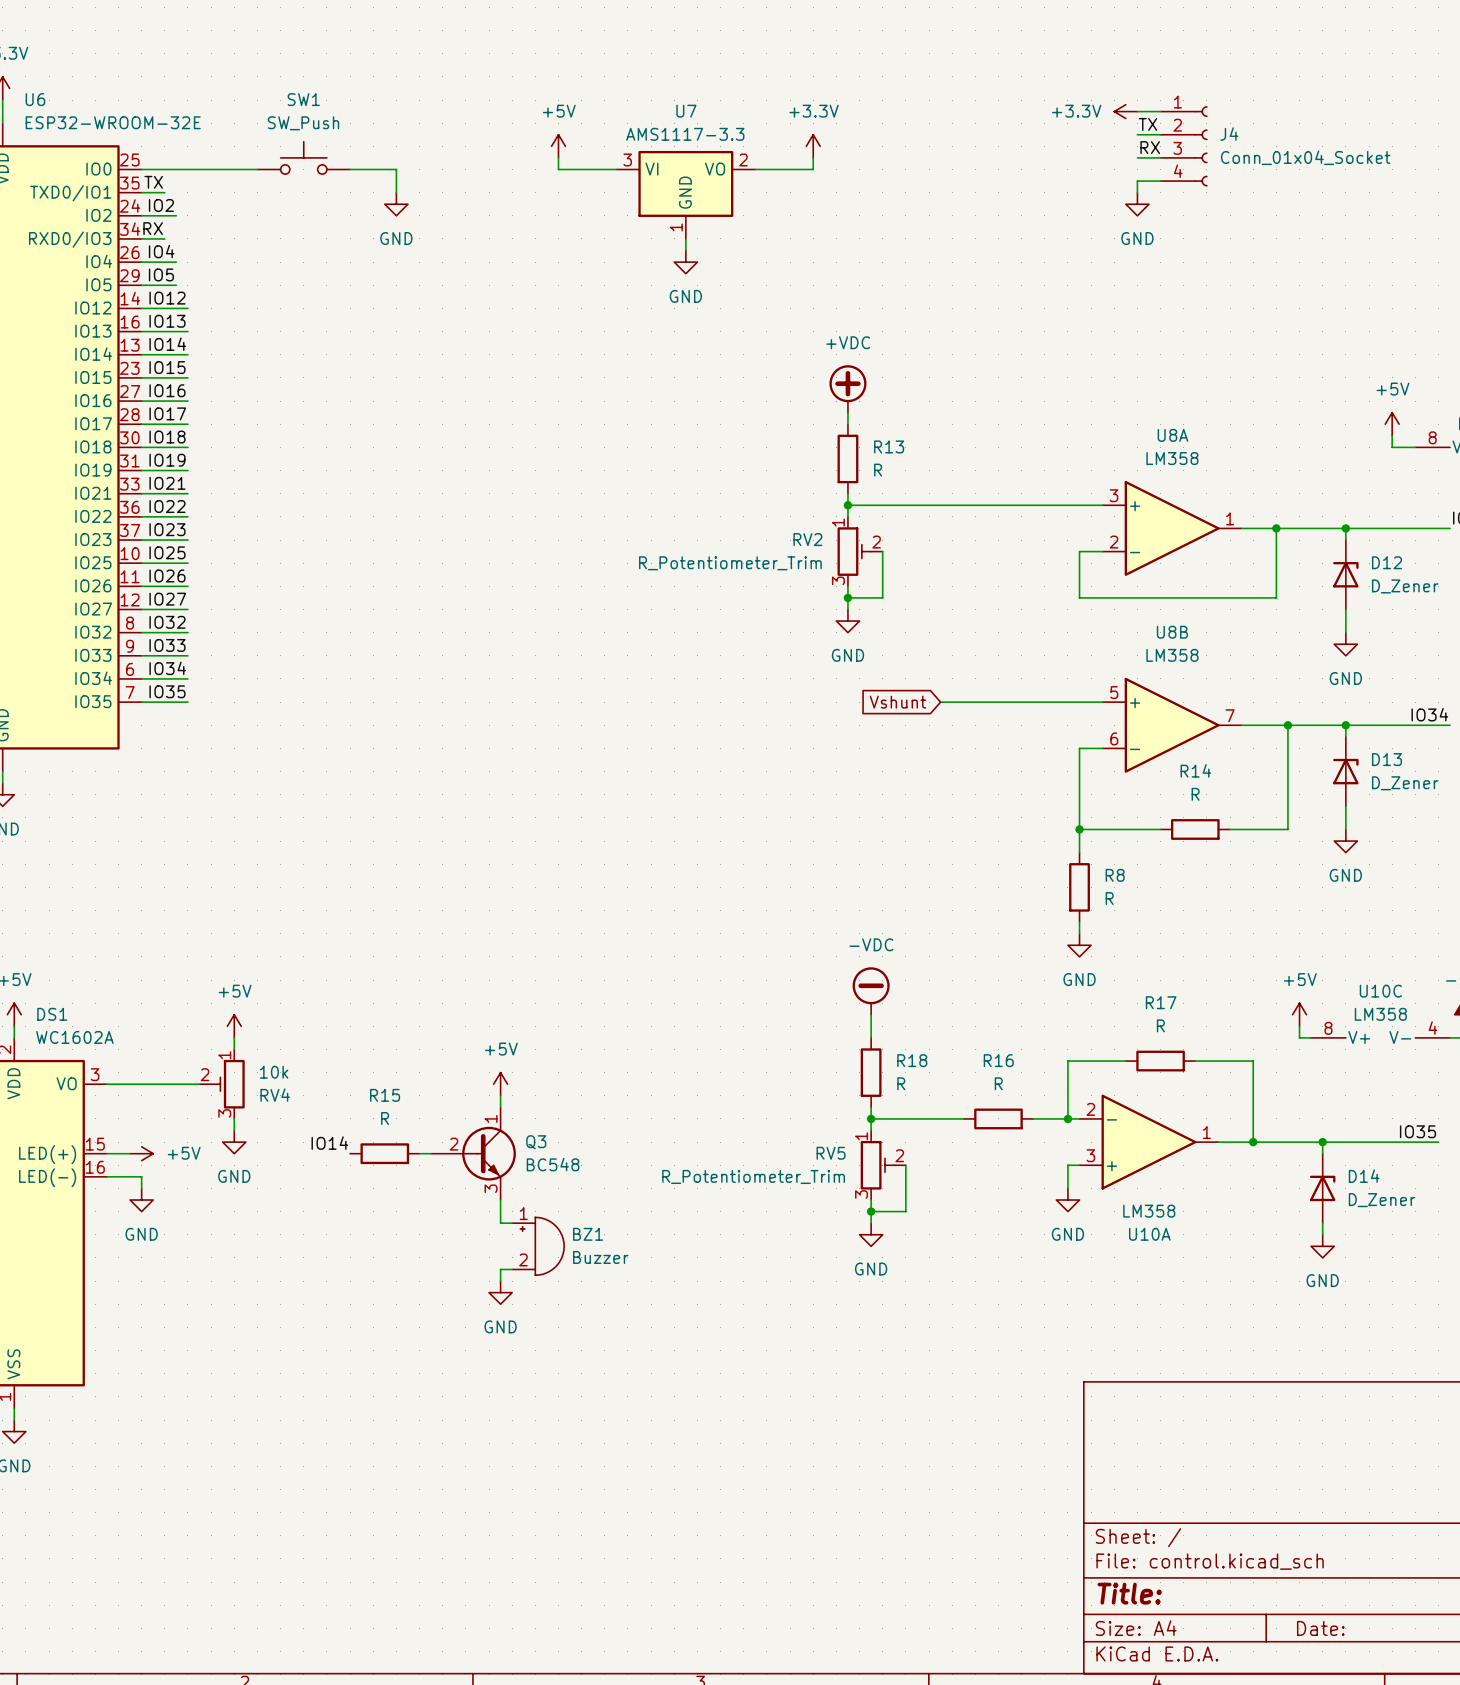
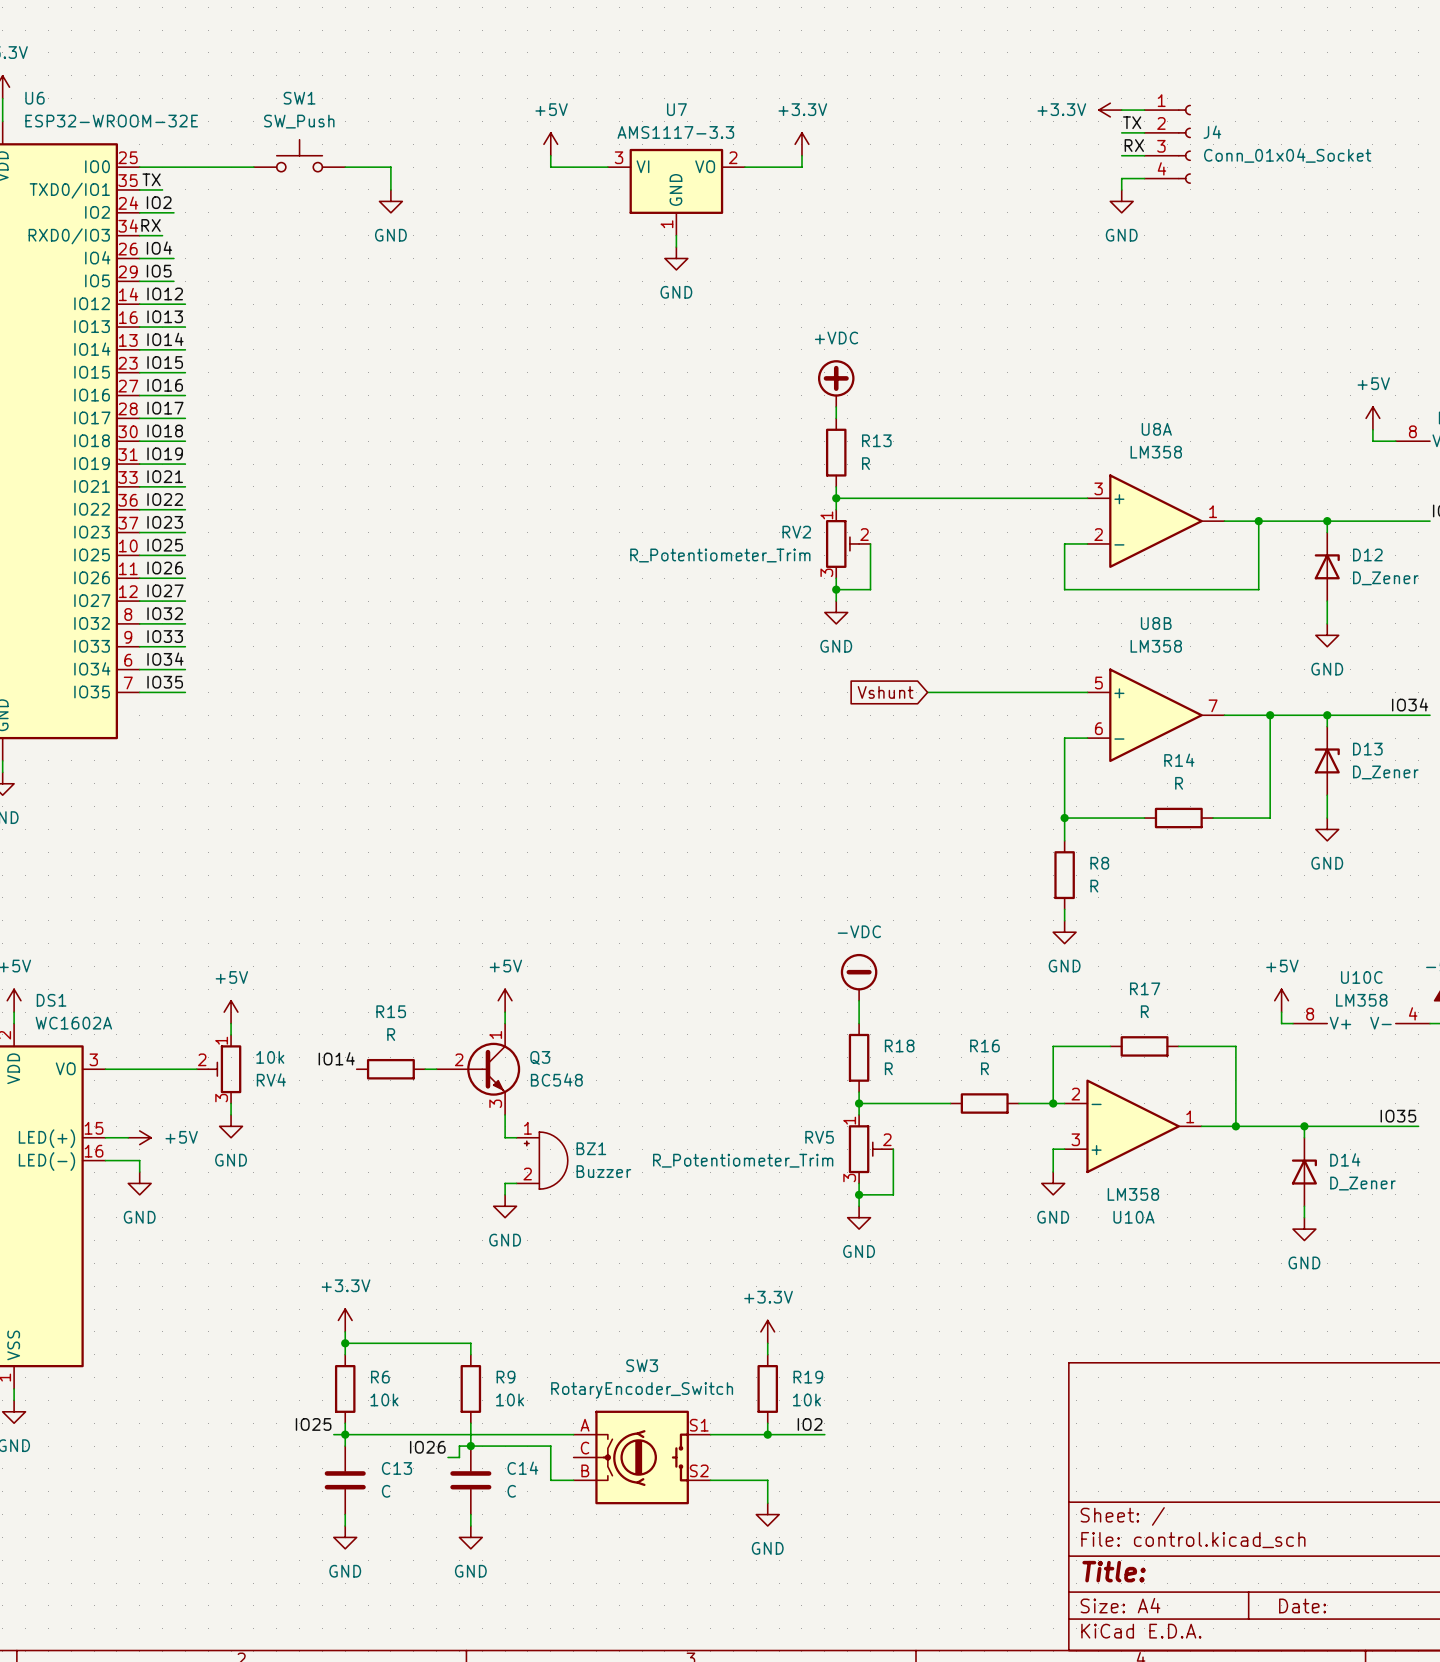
power symbol position: +5V (500, 1084) -> +5V (505, 1000)
wire: (500, 1095) (500, 1107) -> (505, 1012) (505, 1023)
label position: IO14 (329, 1143) -> IO14 (336, 1058)
R15 position: (384, 1153) -> (390, 1069)
wire: (419, 1153) (431, 1153) -> (425, 1069) (436, 1069)
Q3 position: (473, 1153) -> (478, 1069)
wire: (500, 1200) (500, 1223) (512, 1223) -> (505, 1114) (505, 1137) (516, 1137)
BZ1 position: (538, 1246) -> (542, 1160)
wire: (512, 1269) (500, 1269) (500, 1281) -> (516, 1183) (505, 1183) (505, 1194)
power symbol position: GND (500, 1292) -> GND (505, 1206)
power symbol: none -> +3.3V (345, 1320)
wire: none -> (345, 1331) (345, 1354)
power symbol: none -> +3.3V (767, 1331)
wire: none -> (345, 1343) (470, 1343) (470, 1354)
junction: none -> (345, 1343)
wire: none -> (767, 1343) (767, 1354)
R6: none -> 10k (345, 1388)
R9: none -> 10k (470, 1388)
R19: none -> 10k (767, 1388)
wire: none -> (345, 1423) (345, 1446)
wire: none -> (470, 1423) (470, 1446)
wire: none -> (767, 1423) (767, 1434)
label: none -> IO25 (313, 1424)
label: none -> IO2 (810, 1424)
wire: none -> (333, 1434) (573, 1434)
junction: none -> (345, 1434)
wire: none -> (710, 1434) (824, 1434)
junction: none -> (767, 1434)
junction: none -> (470, 1446)
label: none -> IO26 (427, 1447)
wire: none -> (448, 1457) (459, 1457) (459, 1446) (550, 1446) (550, 1480) (573, 1480)
SW3: none -> RotaryEncoder_Switch (642, 1457)
C13: none -> C (345, 1480)
C14: none -> C (470, 1480)
wire: none -> (710, 1480) (767, 1480) (767, 1503)
wire: none -> (345, 1514) (345, 1526)
wire: none -> (470, 1514) (470, 1526)
power symbol: none -> GND (767, 1514)
power symbol: none -> GND (345, 1537)
power symbol: none -> GND (470, 1537)

